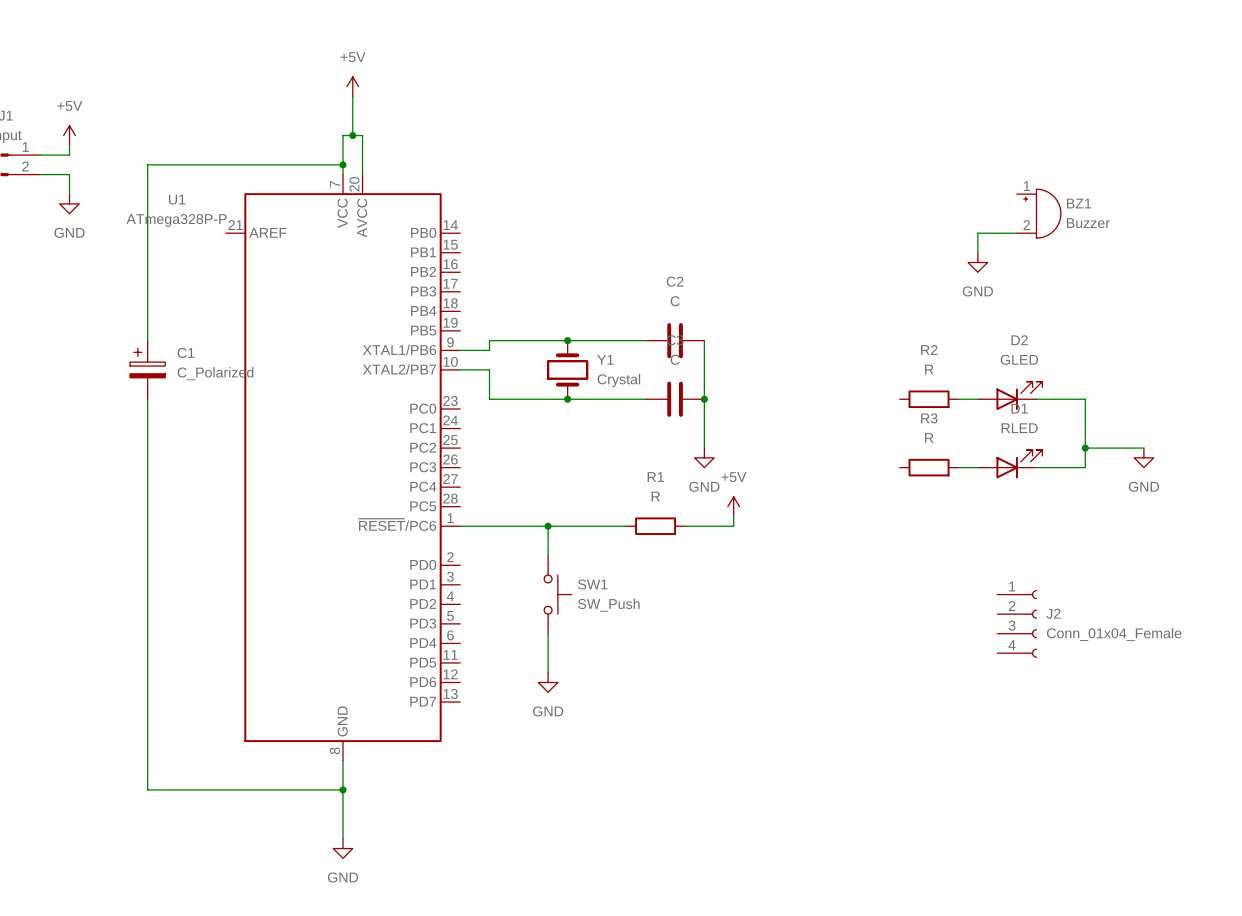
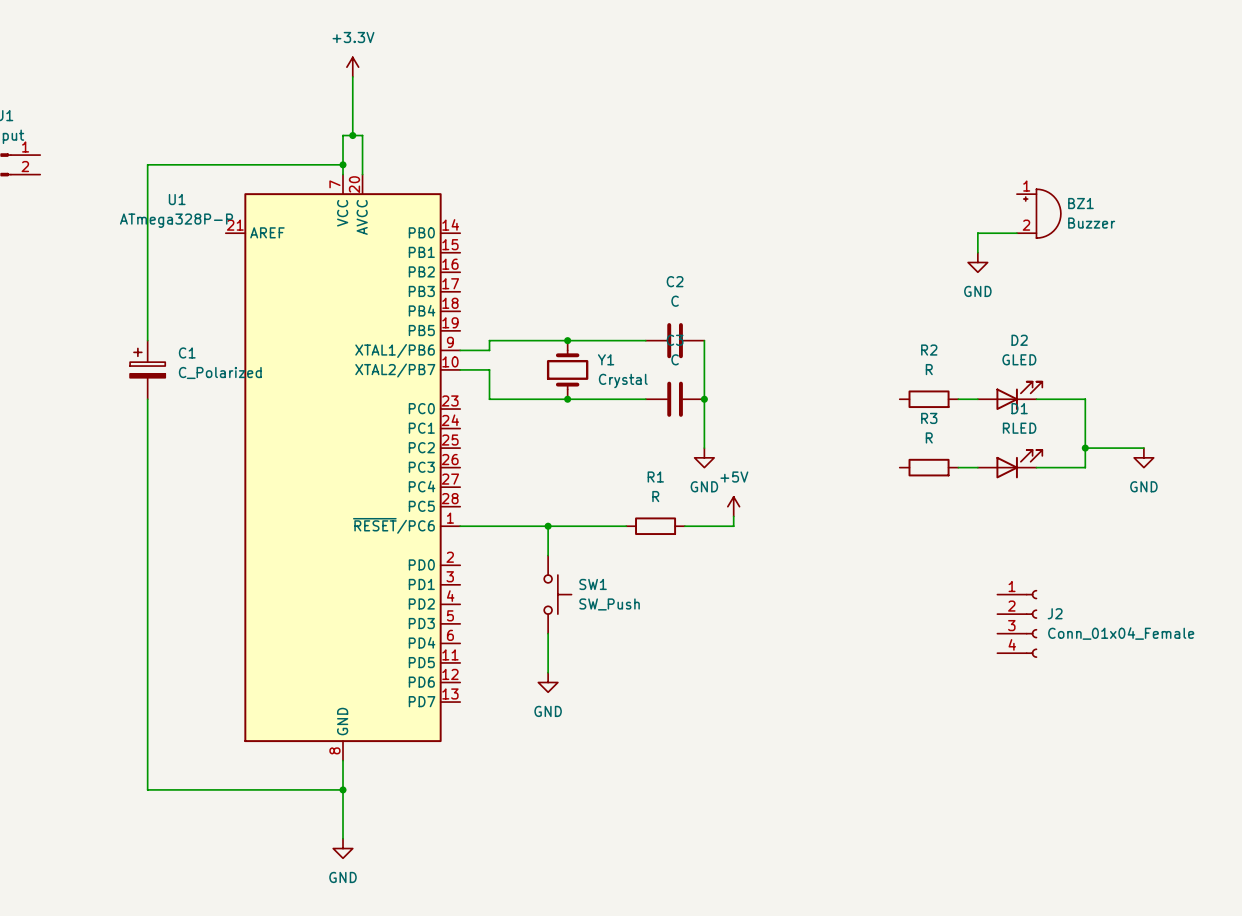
power symbol: none -> +3.3V (352, 67)
power symbol: +5V (352, 86) -> none
power symbol: +5V (69, 135) -> none
wire: (69, 145) (69, 155) (40, 155) -> none
wire: (40, 174) (69, 174) (69, 194) -> none
power symbol: GND (69, 203) -> none

